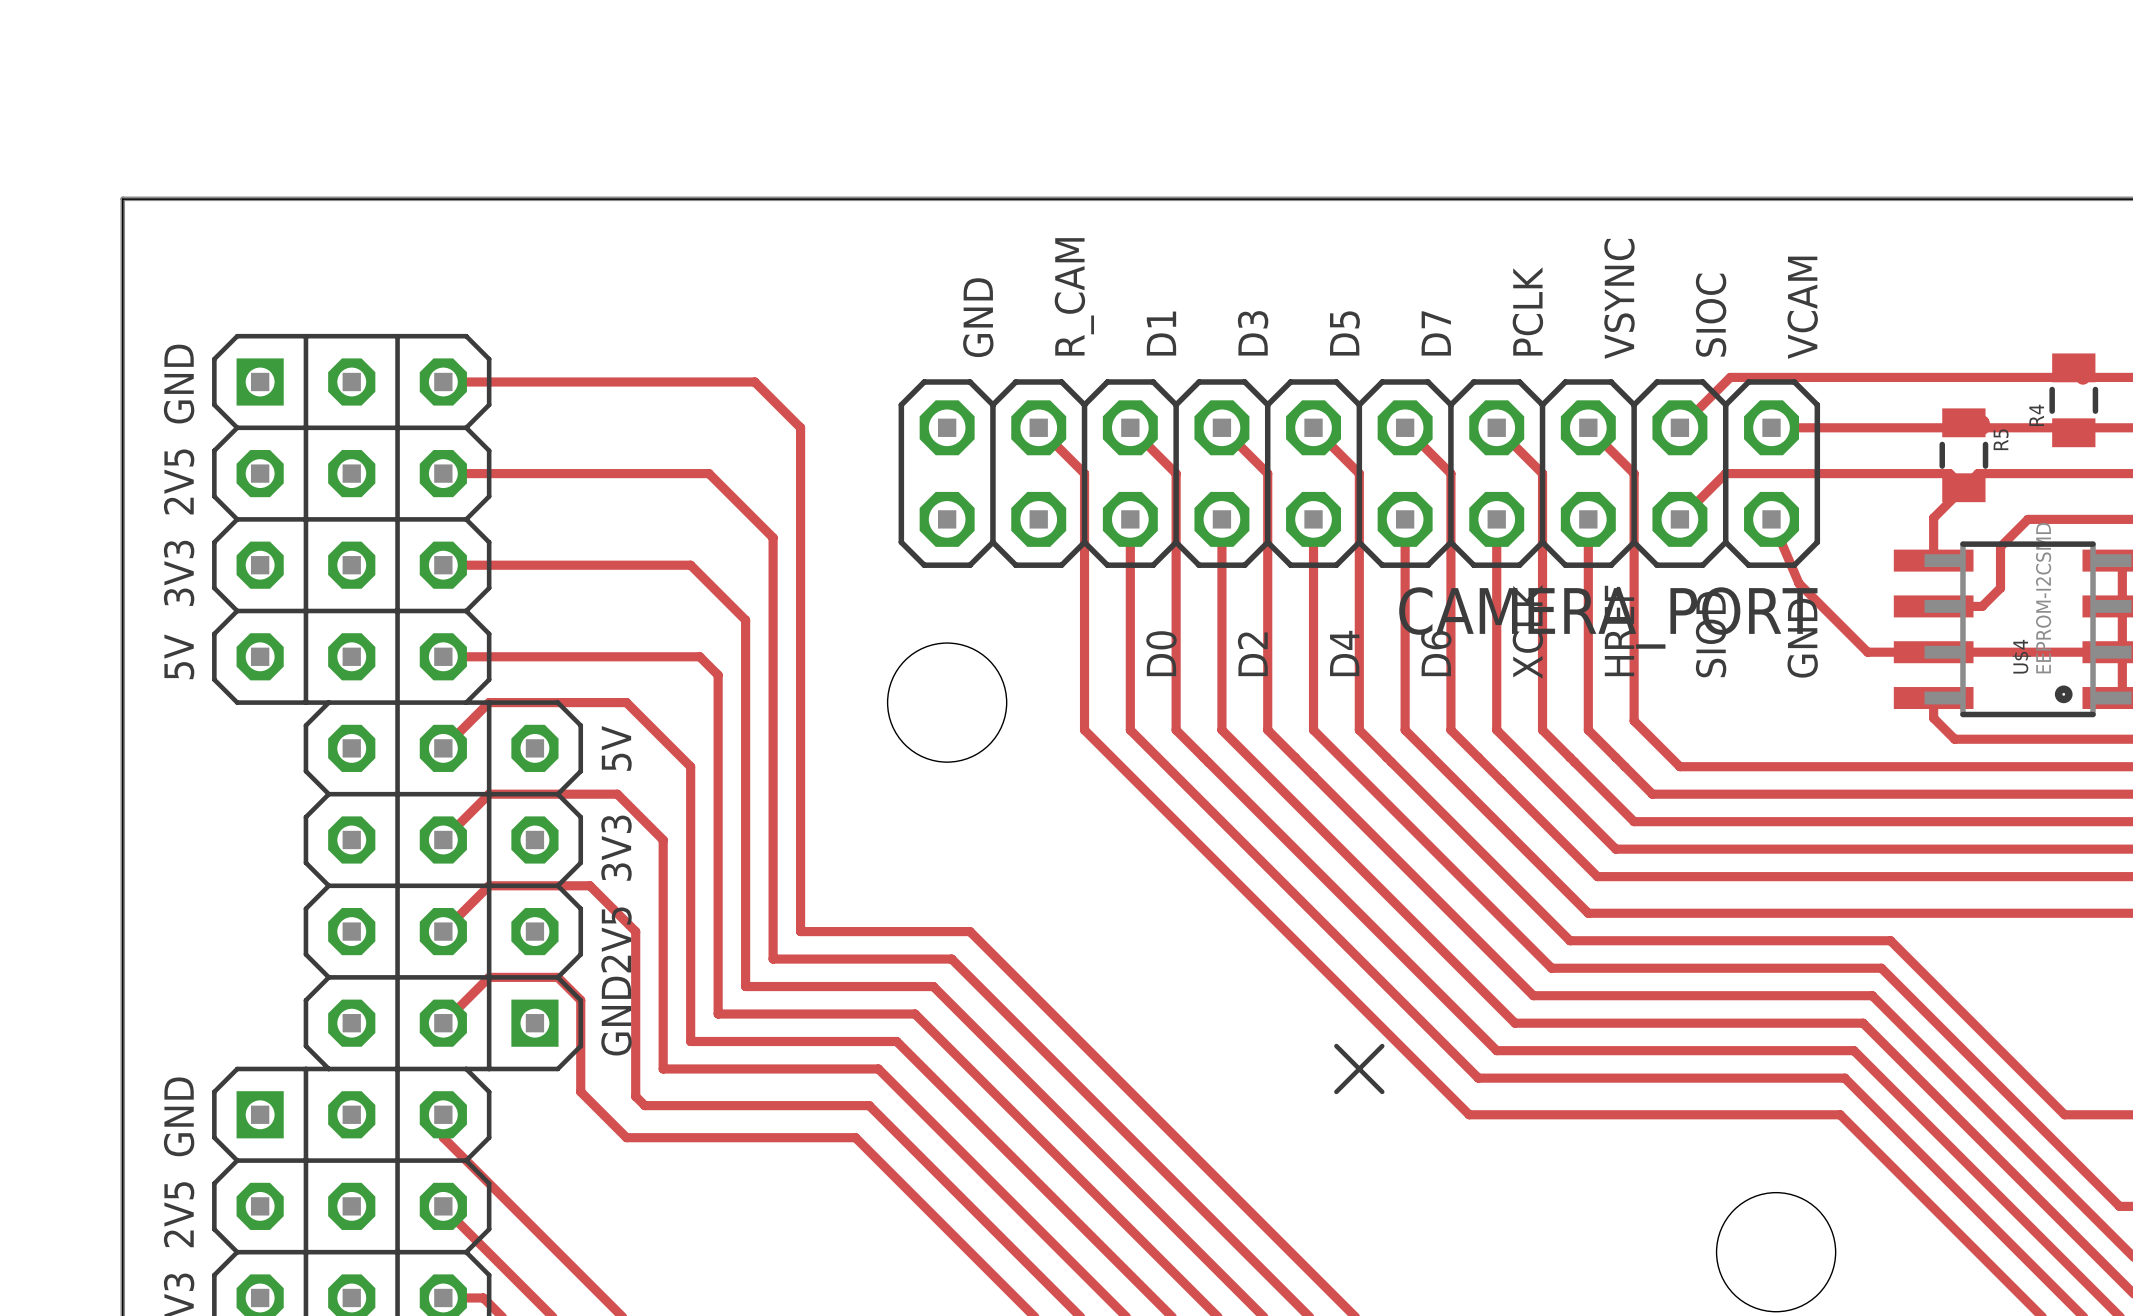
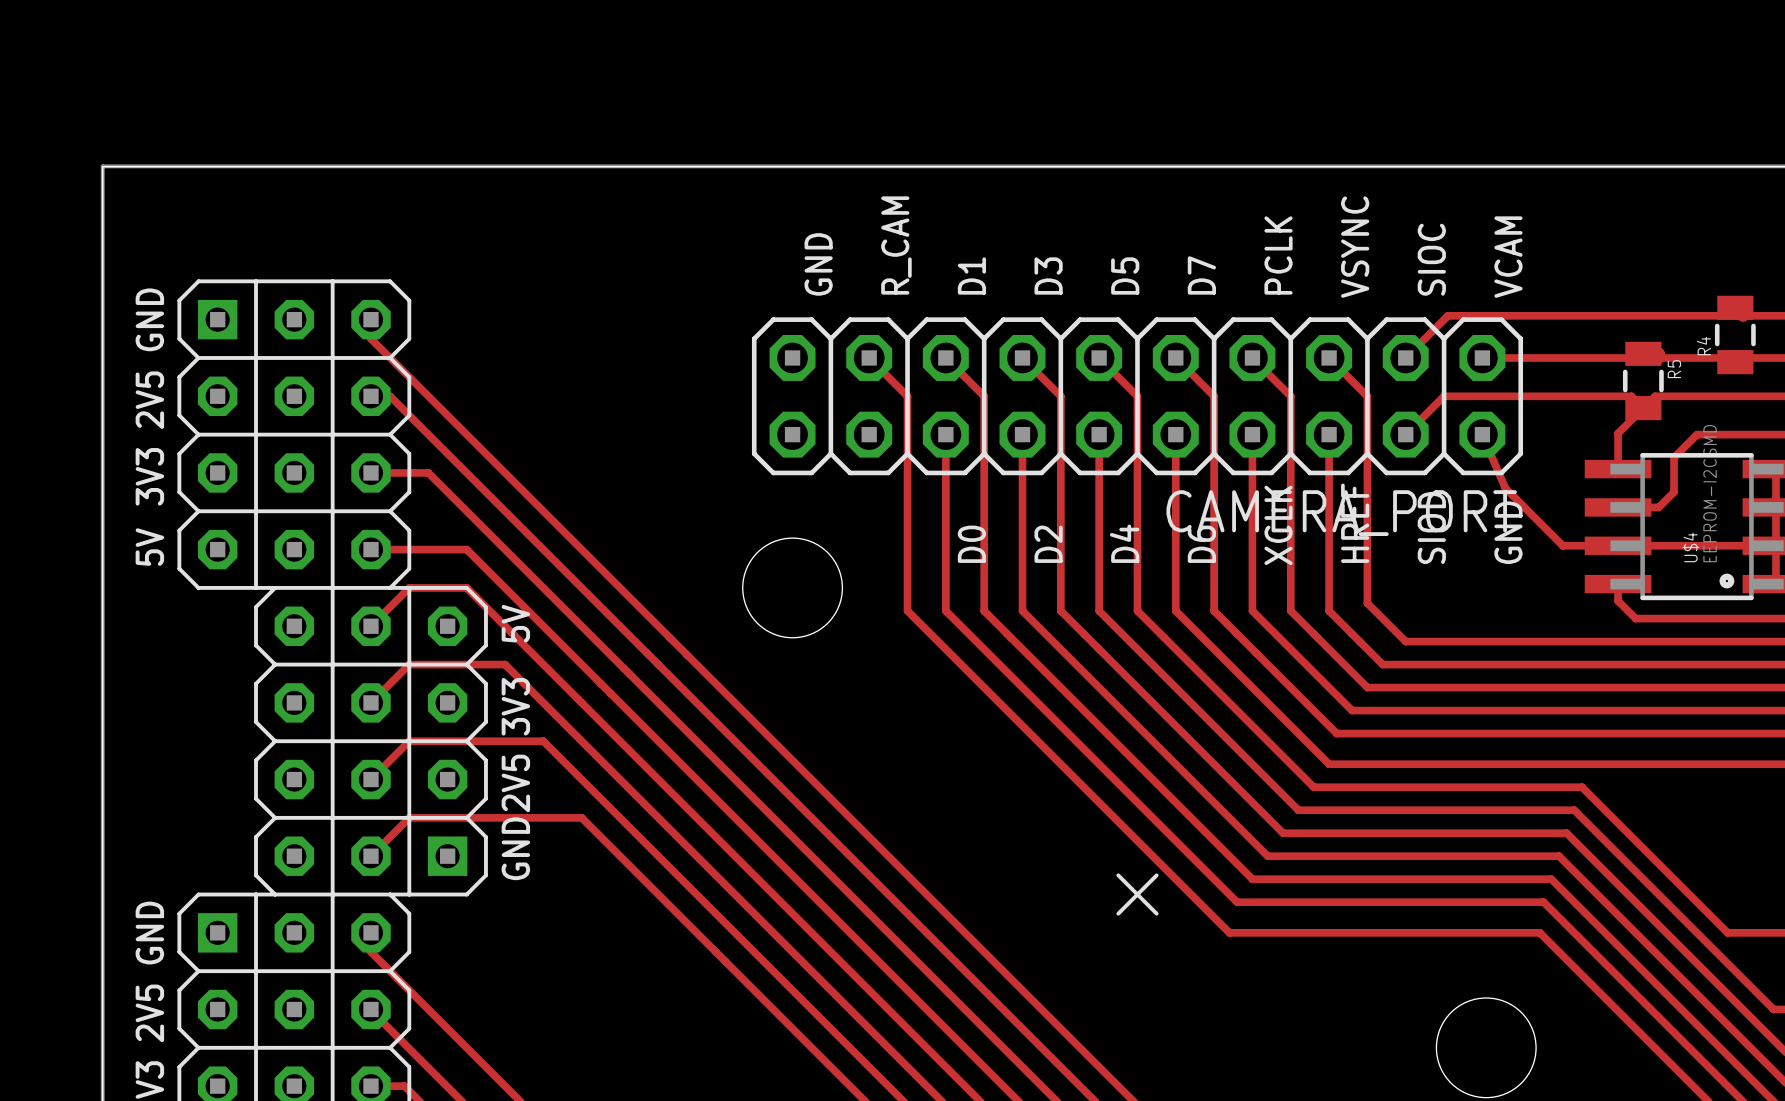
track: (443, 381) (754, 381) (800, 427) (800, 931) (970, 931) -> (370, 319) (370, 338) (811, 779)
track: (466, 473) (708, 473) (773, 537) (773, 959) (951, 959) -> (390, 396) (796, 802)
track: (512, 565) (690, 565) (745, 620) (745, 986) (933, 986) -> (428, 472) (781, 825)
track: (557, 656) (699, 656) (718, 675) (718, 1014) (915, 1014) -> (466, 549) (765, 848)
track: (557, 702) (626, 702) (690, 766) (690, 1041) (896, 1041) -> (466, 587) (750, 871)
track: (603, 794) (617, 794) (663, 839) (663, 1068) (878, 1068) -> (505, 664) (735, 894)
track: (589, 885) (635, 931) (635, 1096) (644, 1105) (869, 1105) -> (493, 741) (543, 741) (727, 925)
track: (557, 977) (580, 1000) (580, 1091) (626, 1137) (855, 1137) -> (466, 817) (581, 817) (715, 952)

